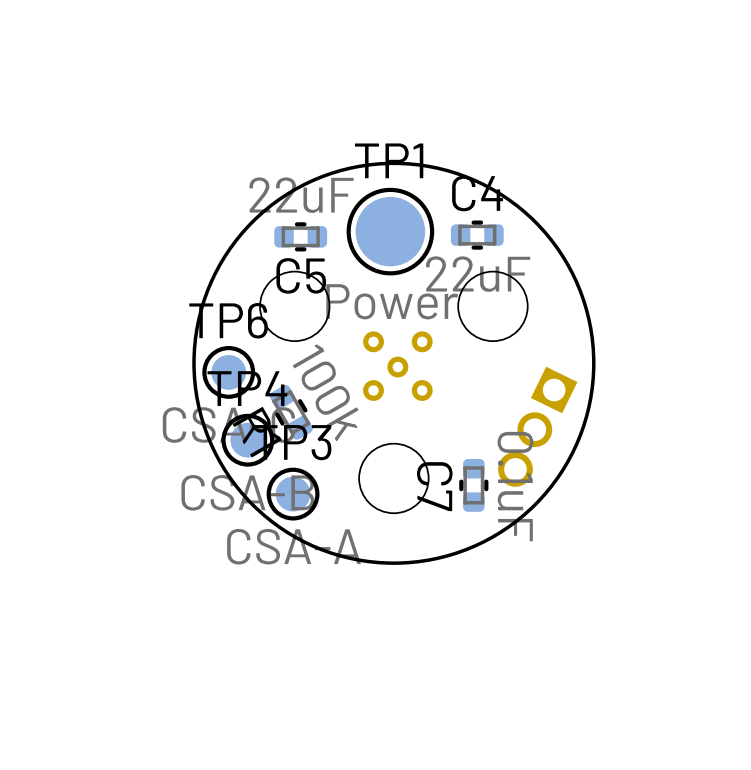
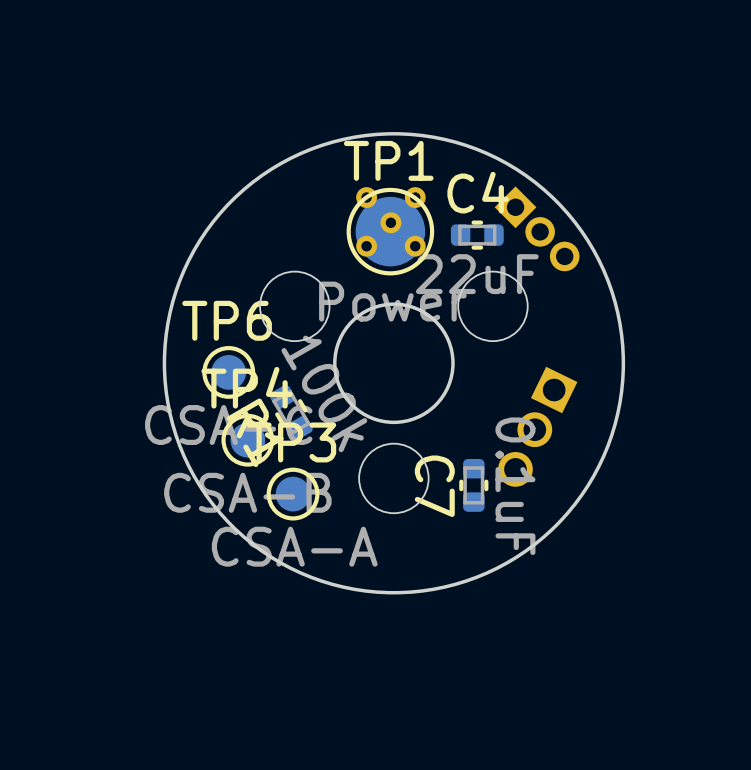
round board edge: none -> [162, 132, 626, 595]
round board edge: [192, 161, 596, 565] -> none
part: none -> (537, 228)
C5: 22uF (300, 236) -> none
round board edge: none -> [333, 302, 455, 425]
part position: (397, 366) -> (390, 221)

